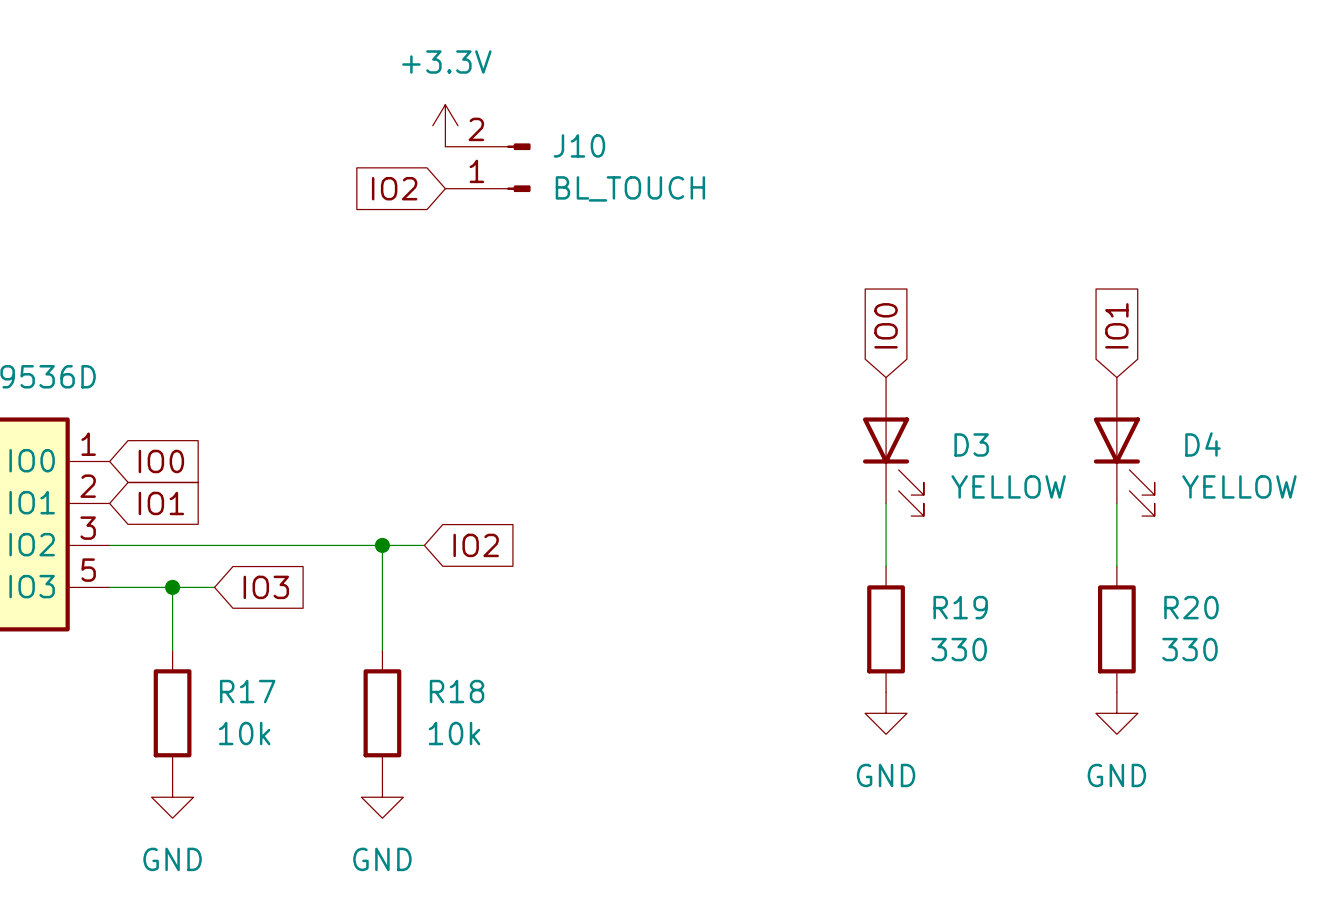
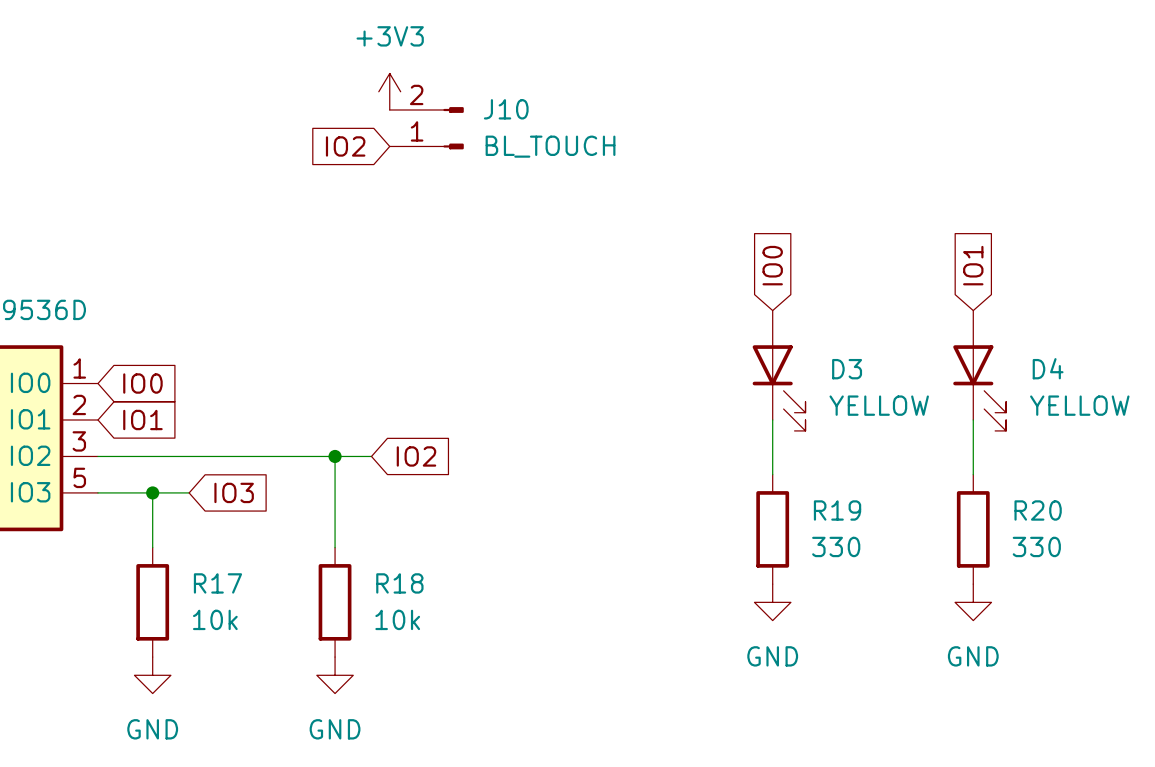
power symbol: +3.3V (445, 125) -> +3V3 (389, 91)

